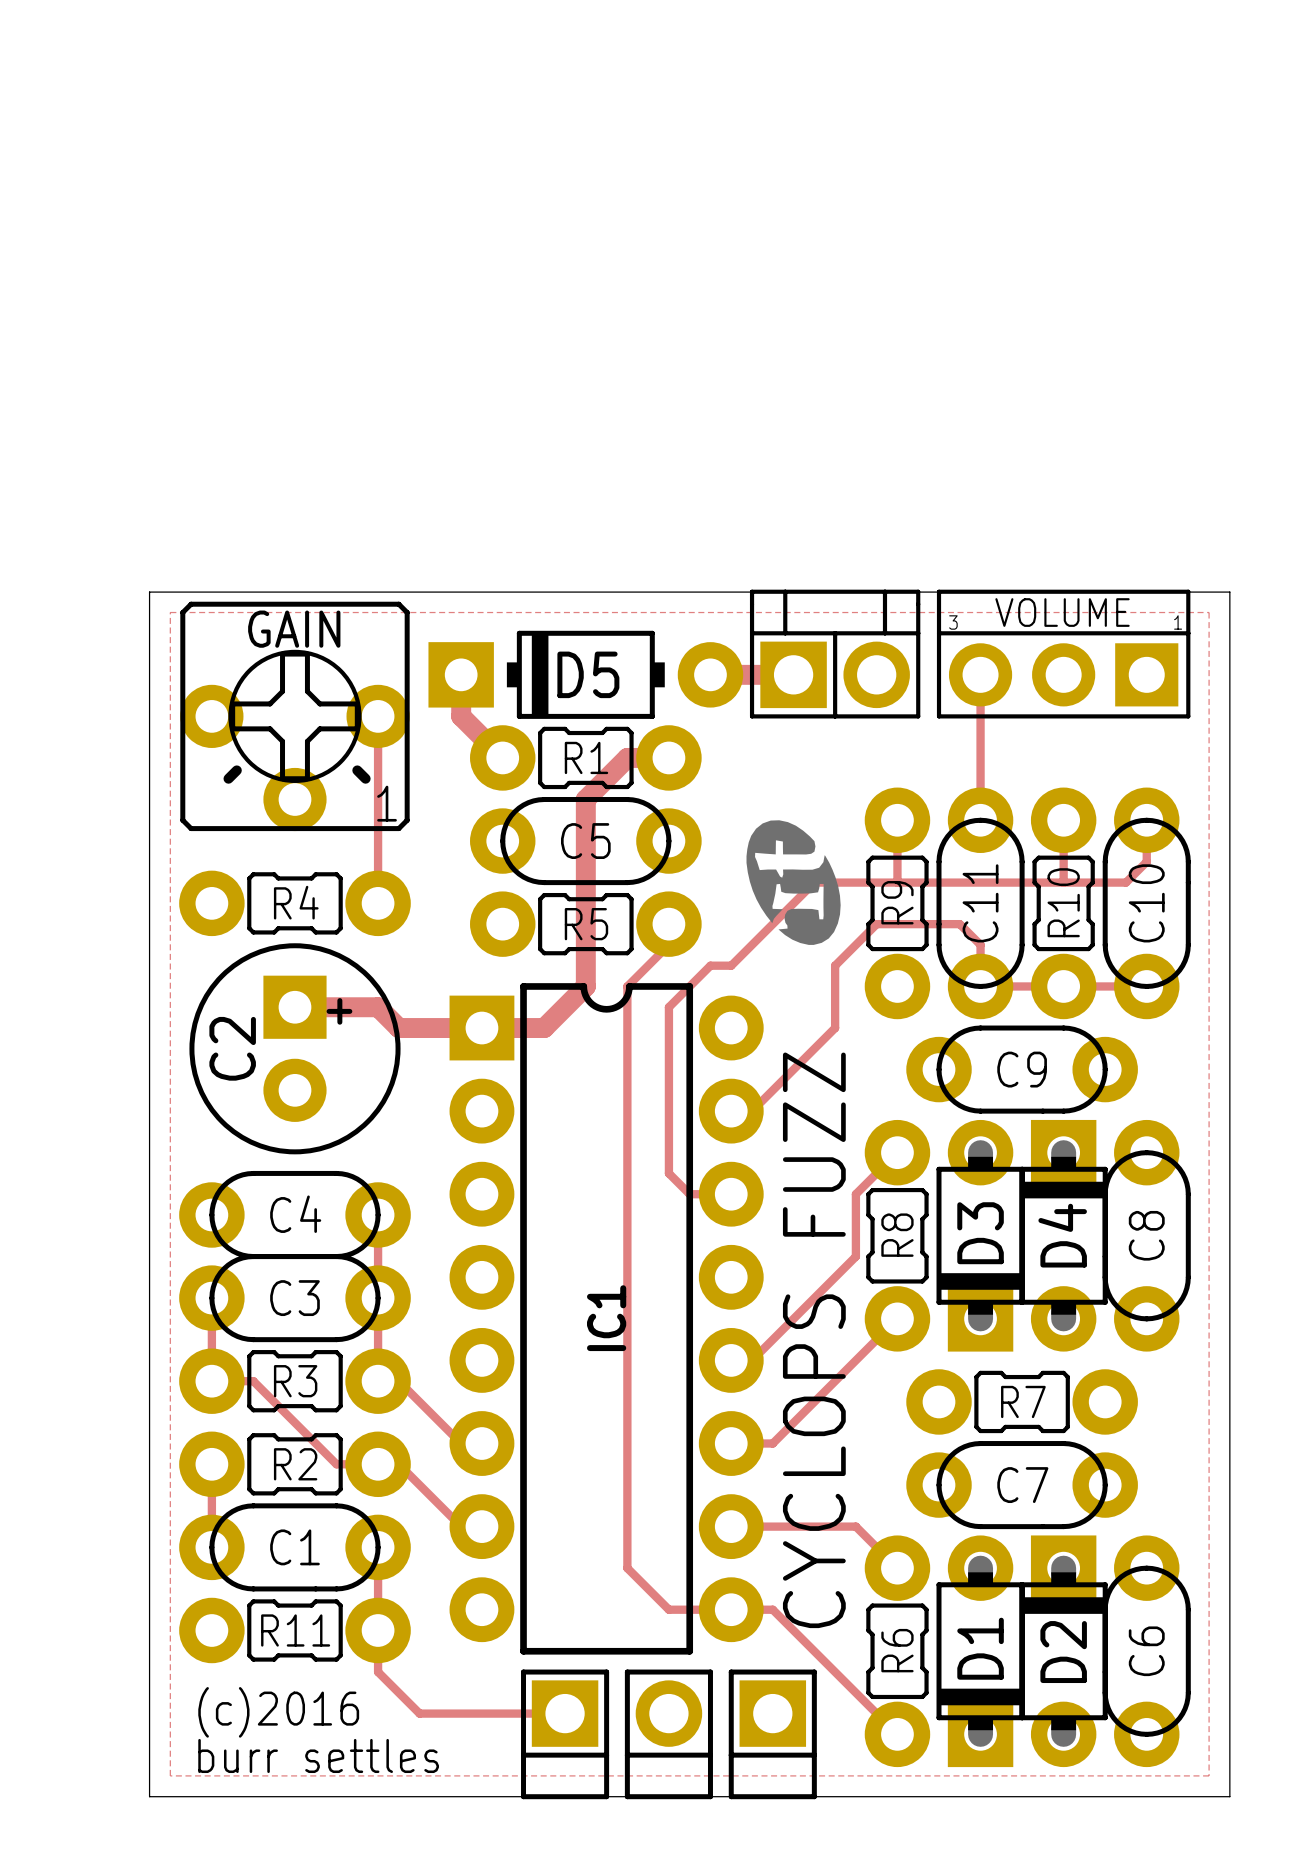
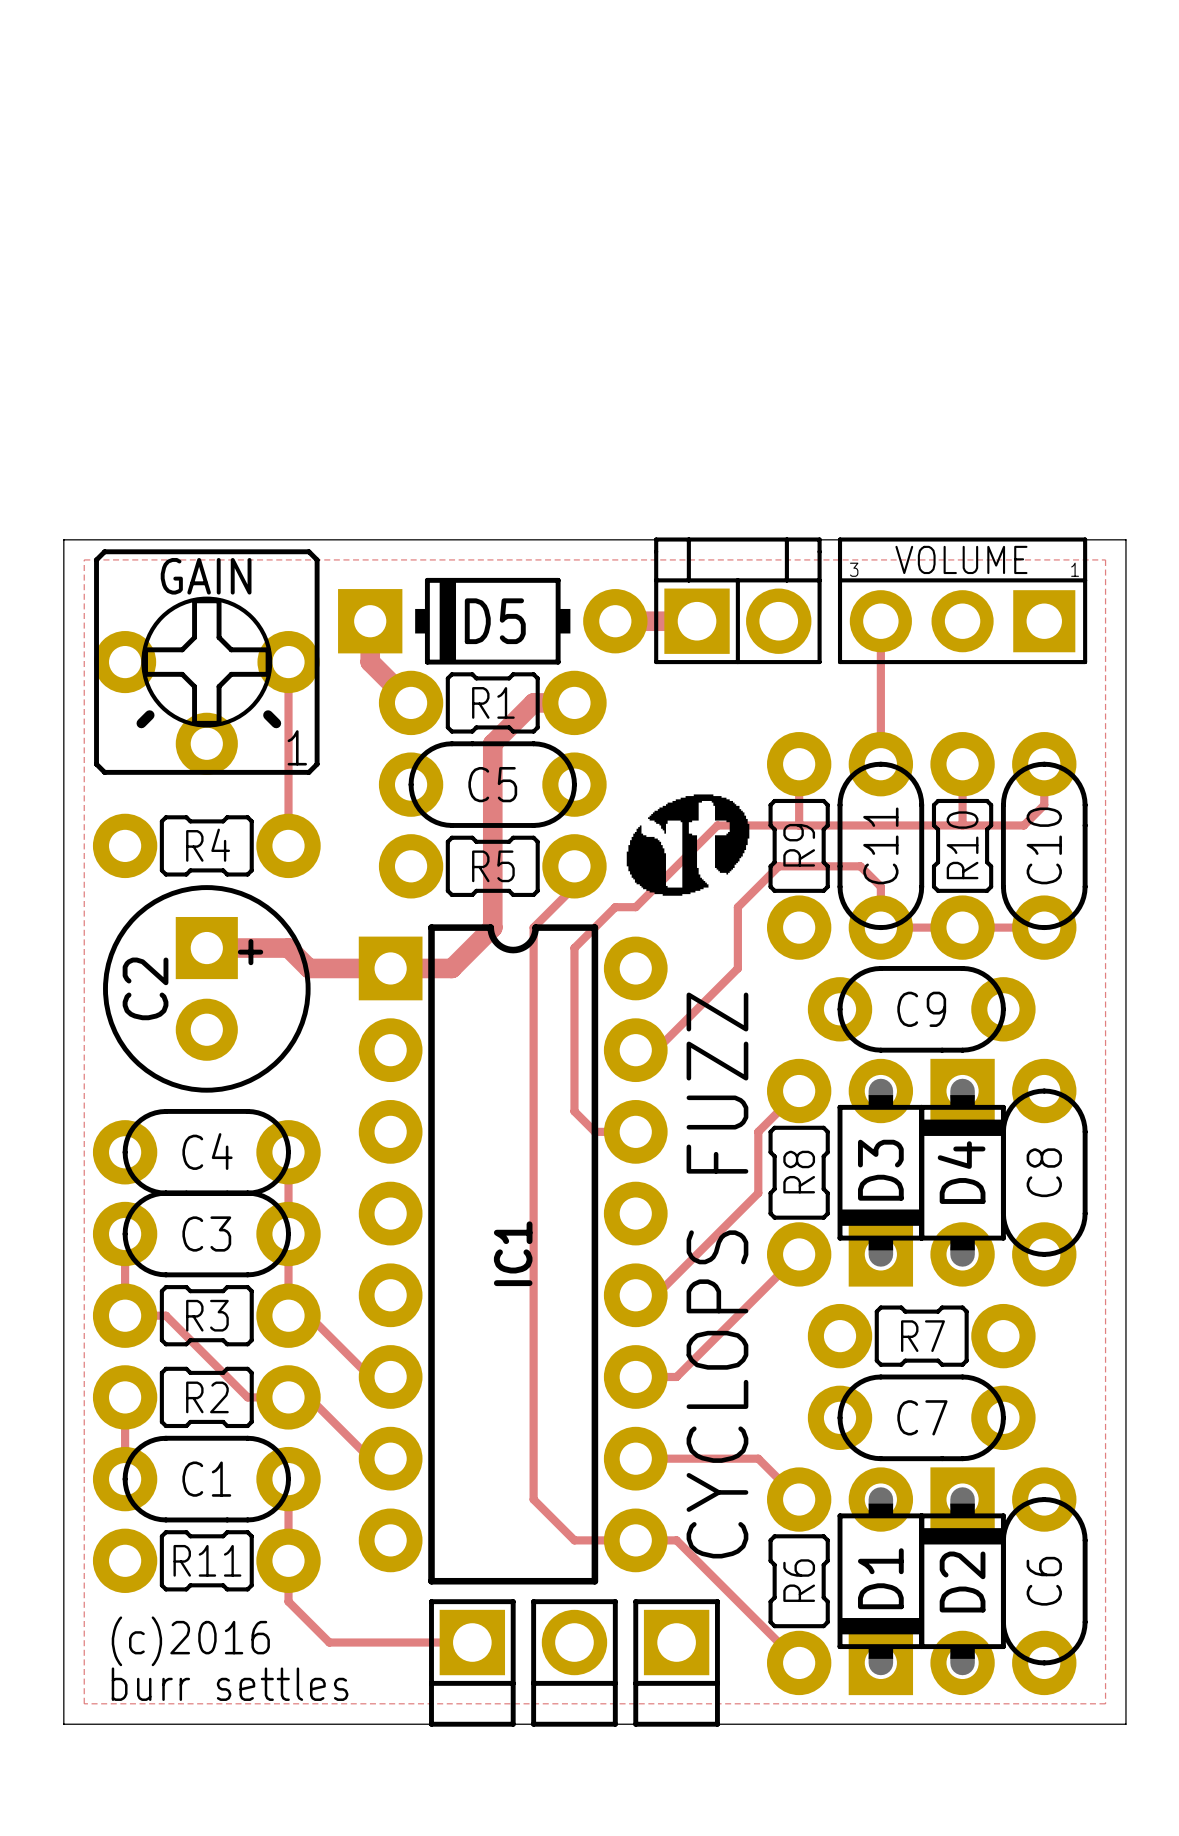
drawing shape: [746, 820, 841, 945] -> [626, 794, 750, 896]

